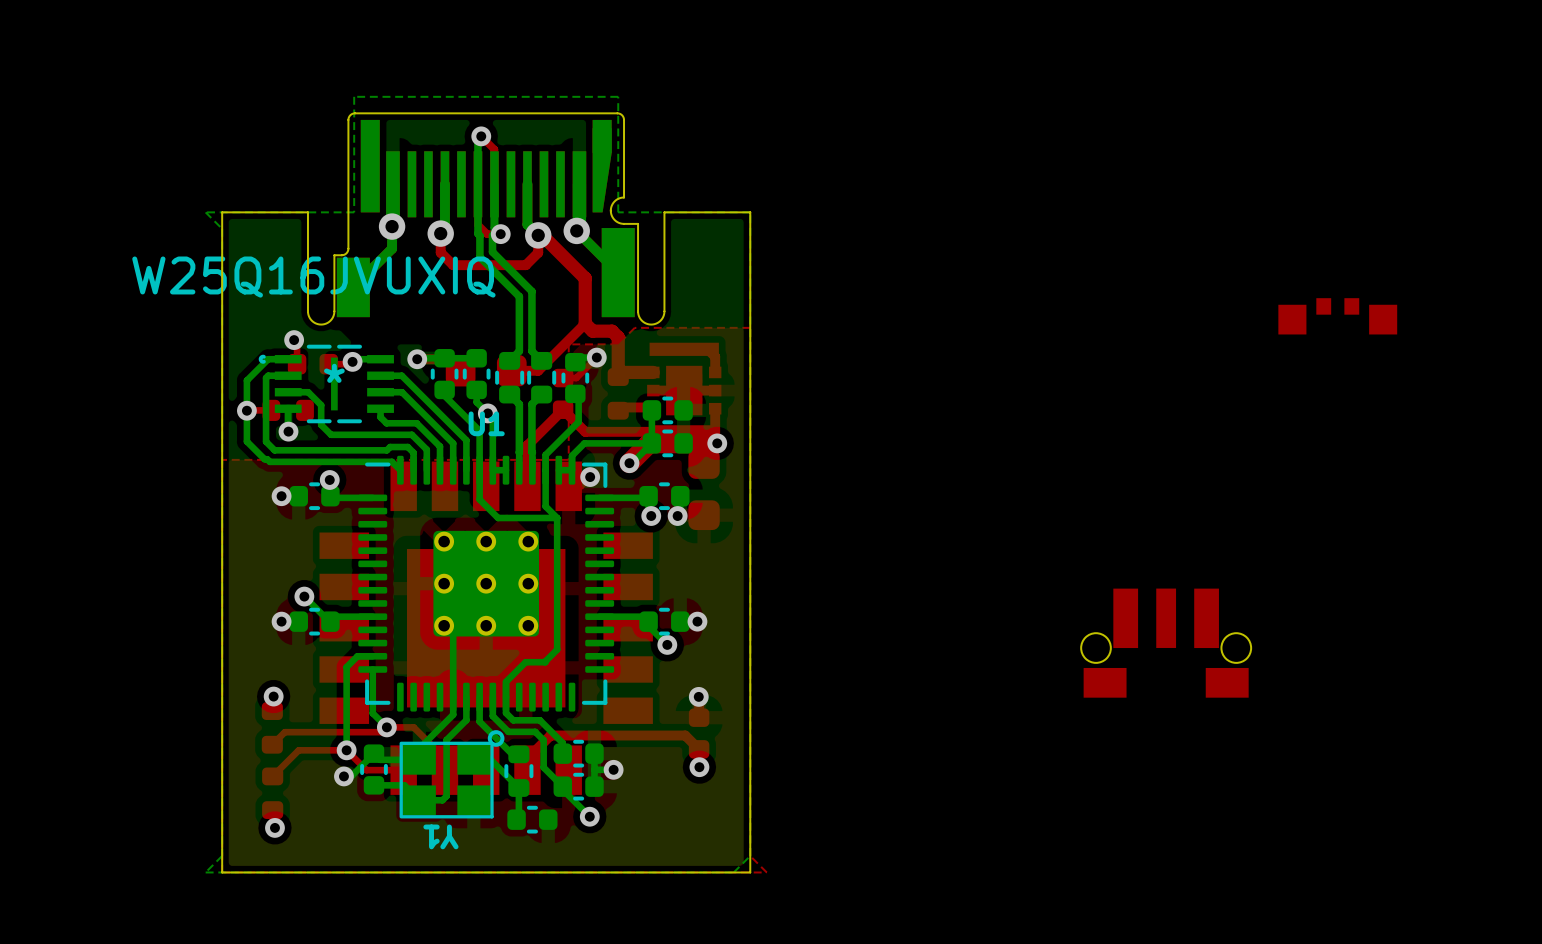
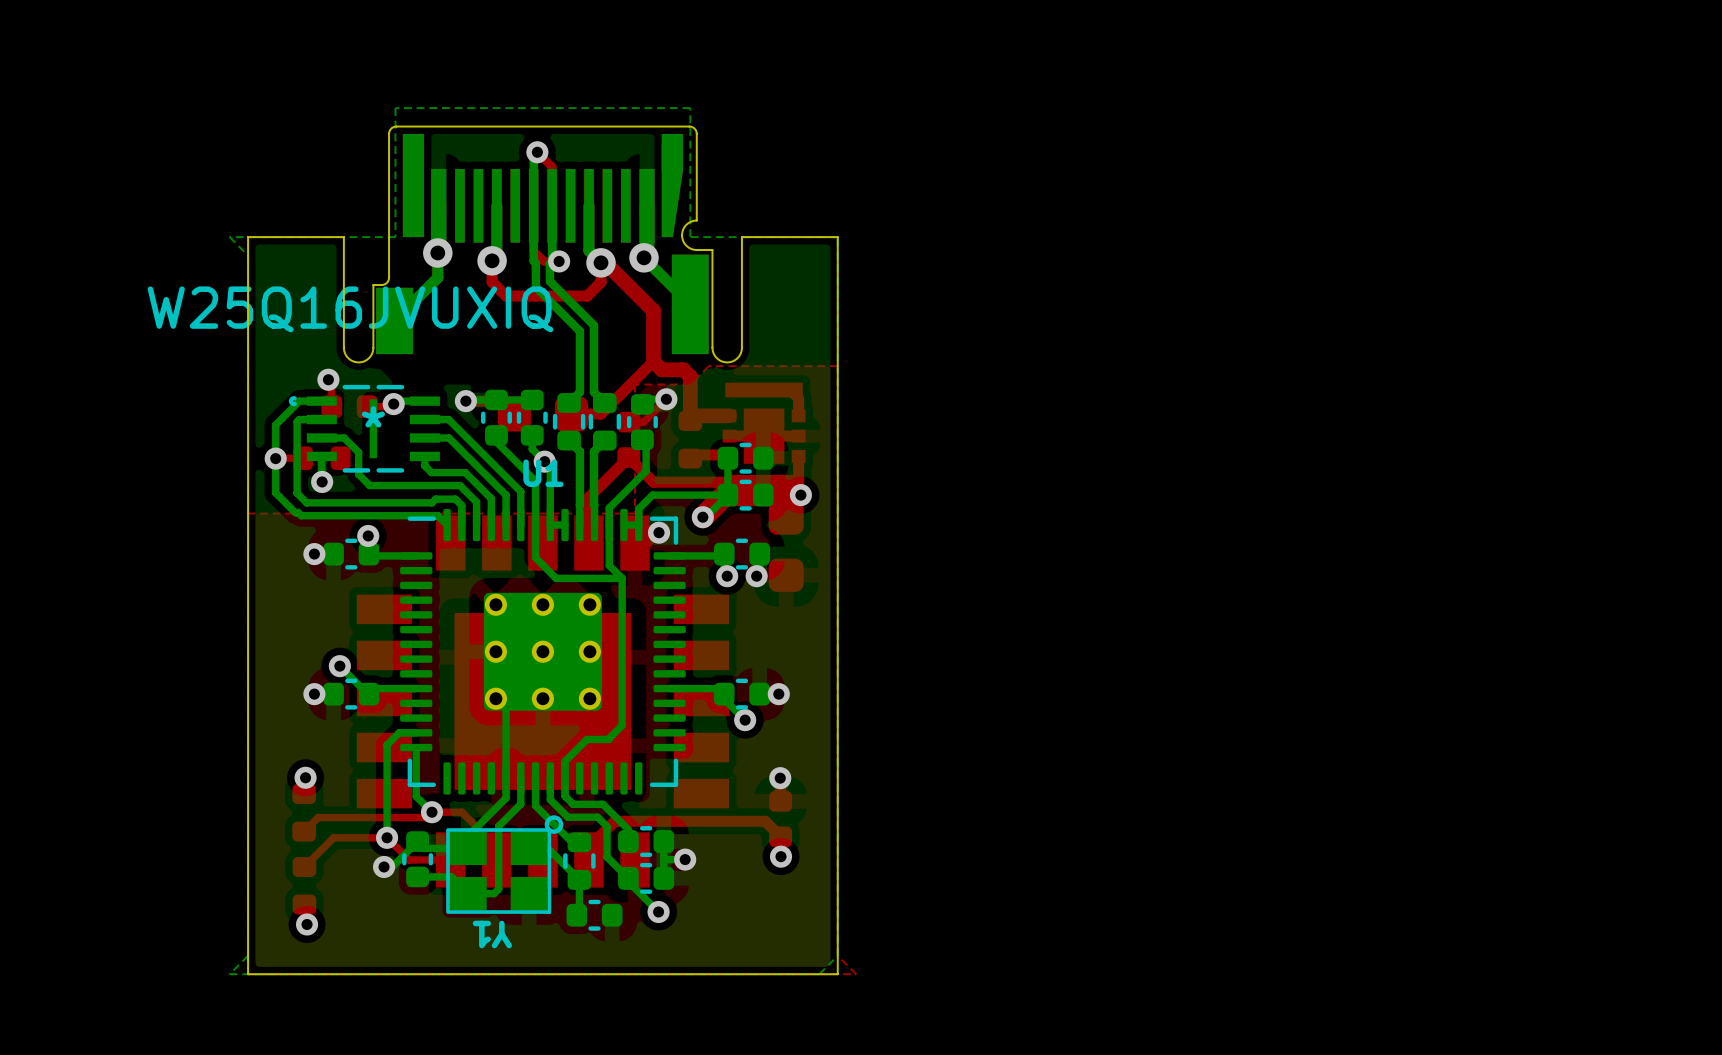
part: (1337, 316) -> none
part: (1166, 643) -> none

